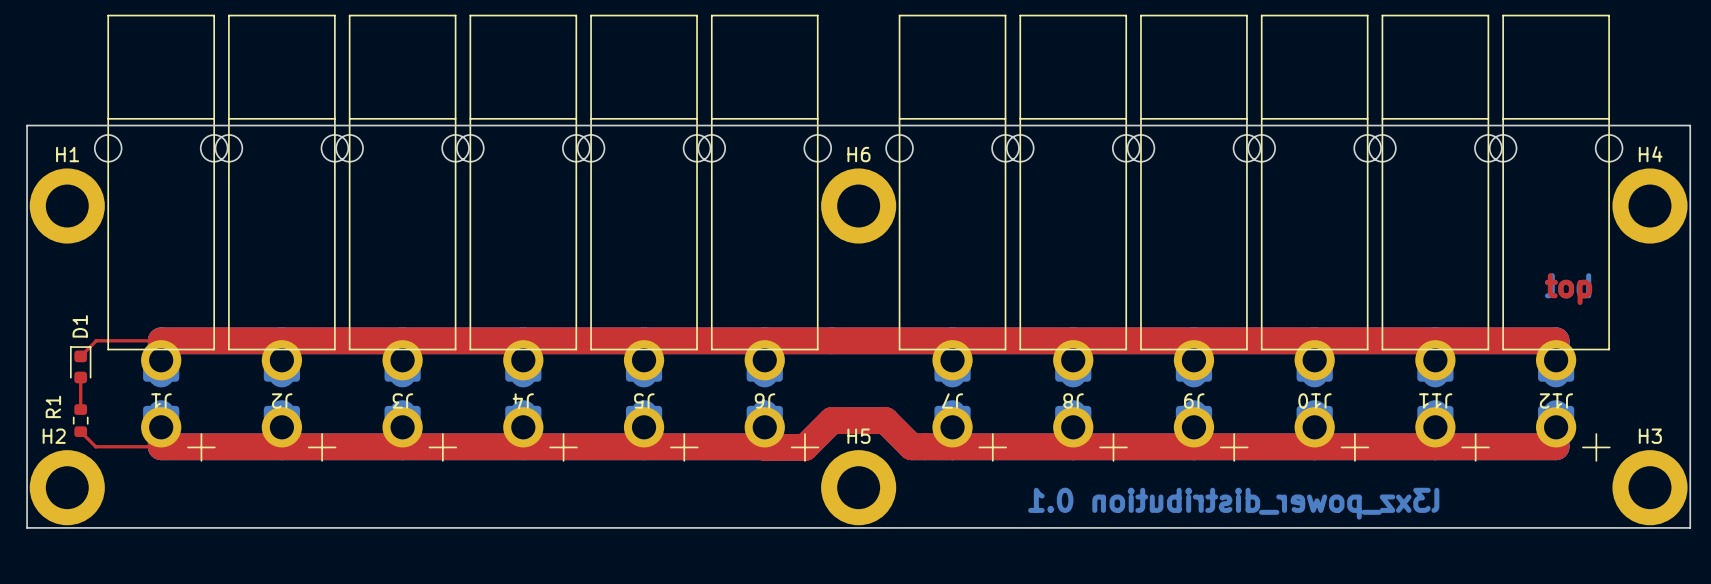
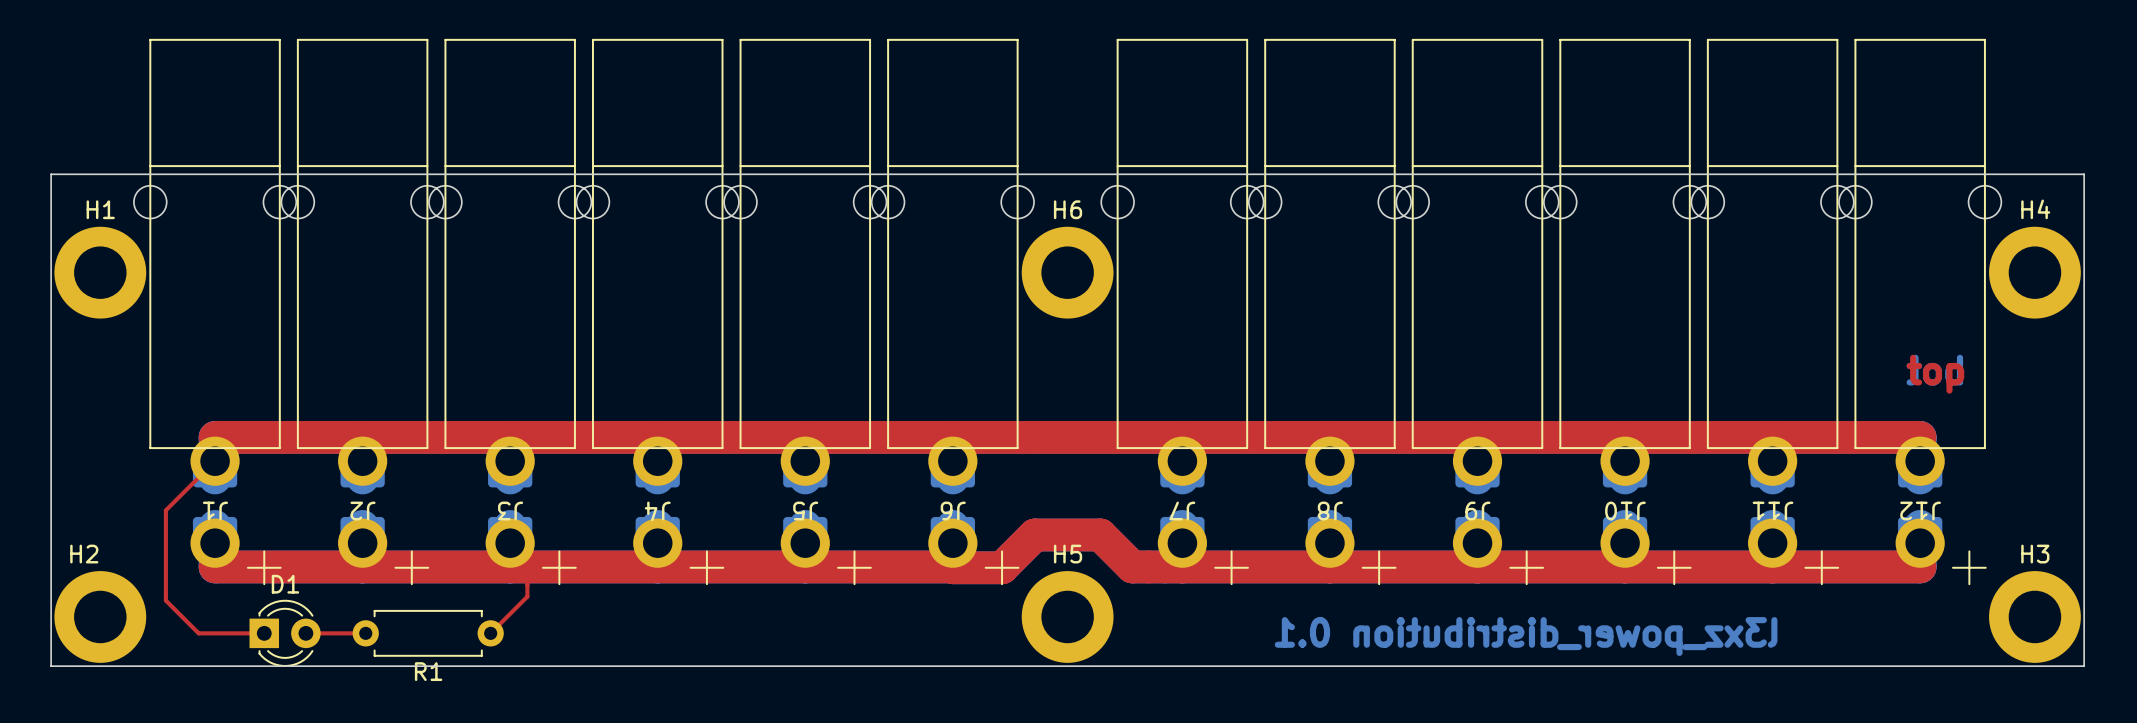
top track: (161, 340) (96, 340) (80, 356) -> none
D1 footprint: [70, 346, 92, 384] -> [249, 599, 321, 667]
top track: none -> (215, 461) (165, 510) (165, 600) (198, 633) (264, 633)
top track: (80, 377) (80, 409) -> none
R1 footprint: [72, 404, 89, 438] -> [352, 609, 504, 657]
R1 name position: R1 (53, 406) -> R1 (428, 671)
top track: (80, 431) (95, 446) (161, 446) -> none
top track: none -> (527, 566) (527, 596) (490, 633)
top track: none -> (305, 633) (365, 633)

